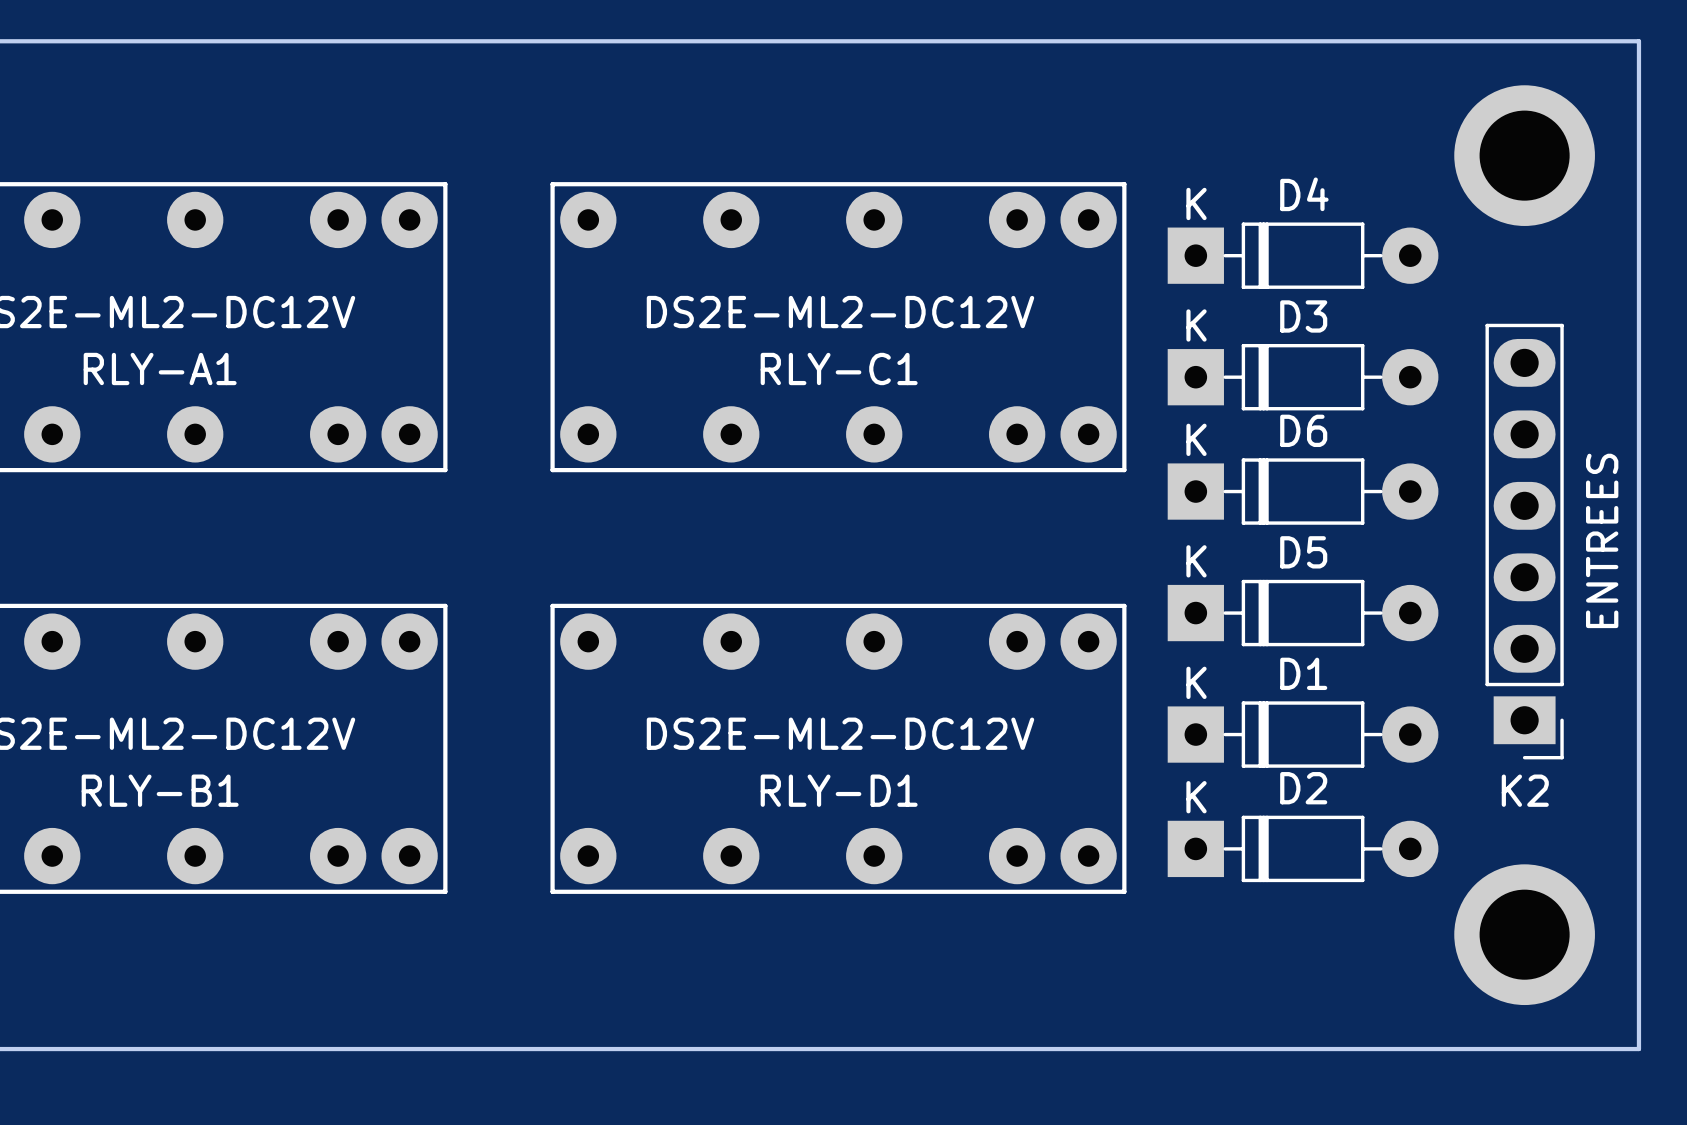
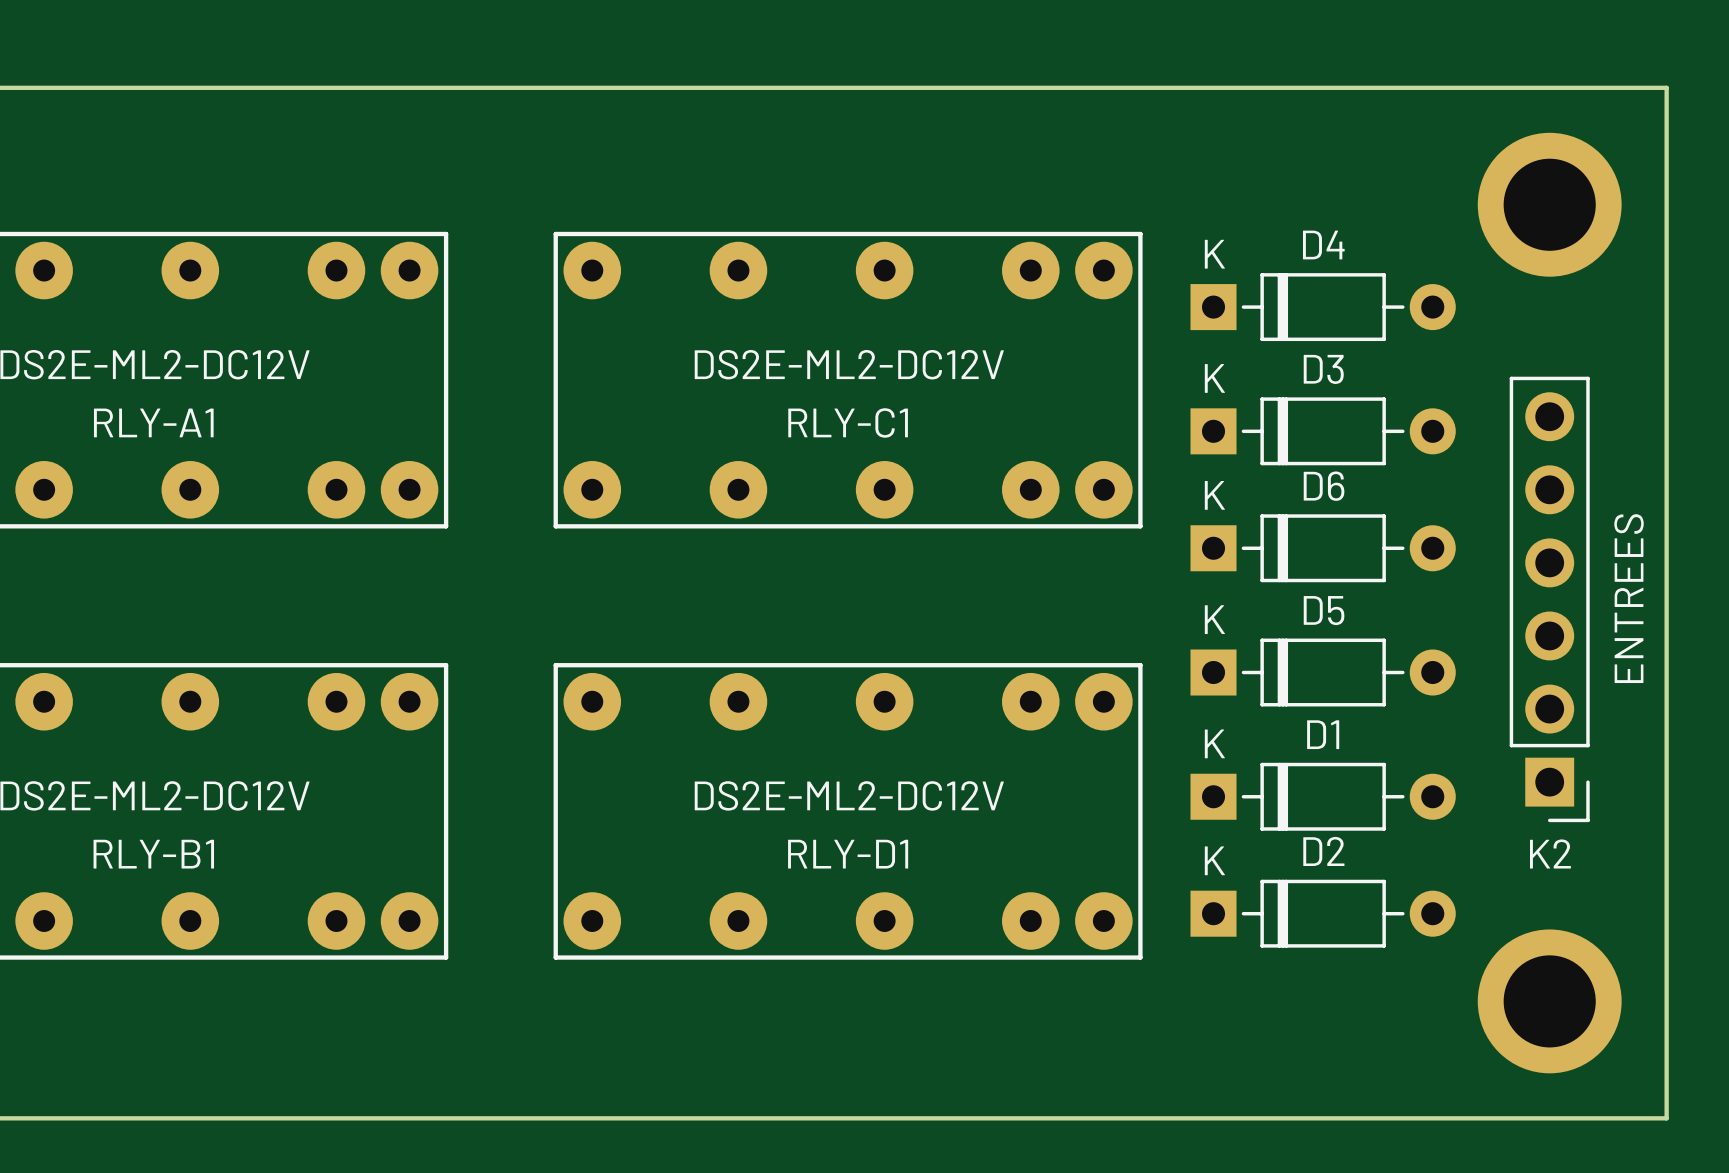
D4 footprint: [1167, 222, 1439, 289] -> [1190, 273, 1456, 342]
K2 footprint: [1485, 323, 1564, 760] -> [1509, 376, 1590, 823]
D3 footprint: [1167, 343, 1439, 411] -> [1190, 397, 1456, 466]
D6 footprint: [1167, 458, 1439, 525] -> [1190, 514, 1456, 583]
D5 footprint: [1167, 579, 1439, 647] -> [1190, 638, 1456, 707]
D1 footprint: [1167, 701, 1439, 768] -> [1190, 762, 1456, 831]
D2 footprint: [1167, 815, 1439, 883] -> [1190, 879, 1456, 948]

